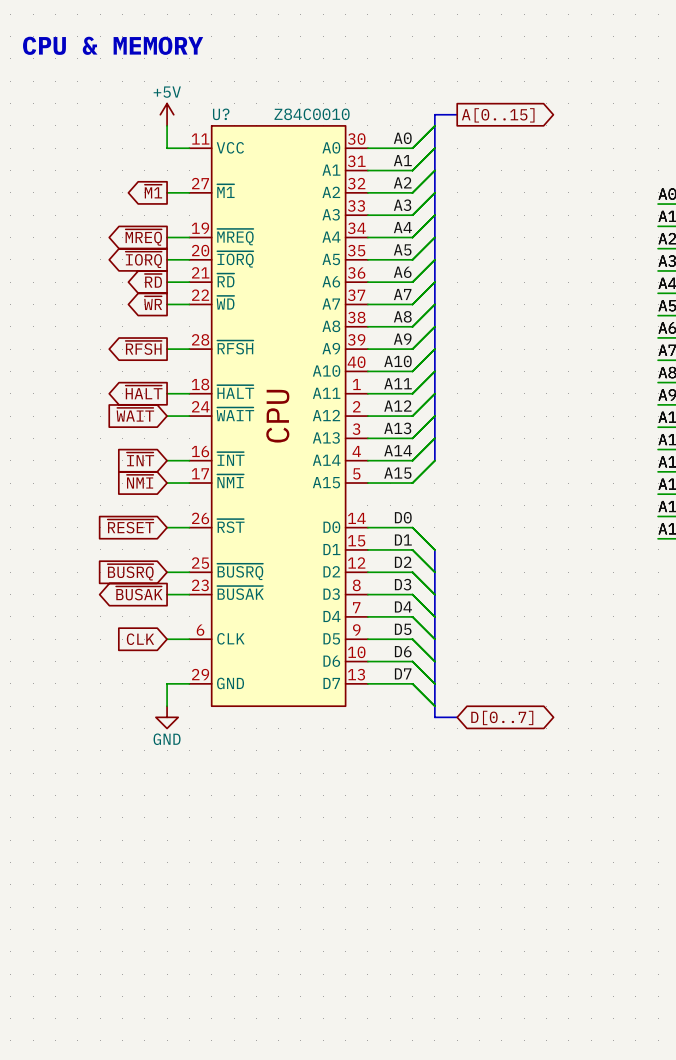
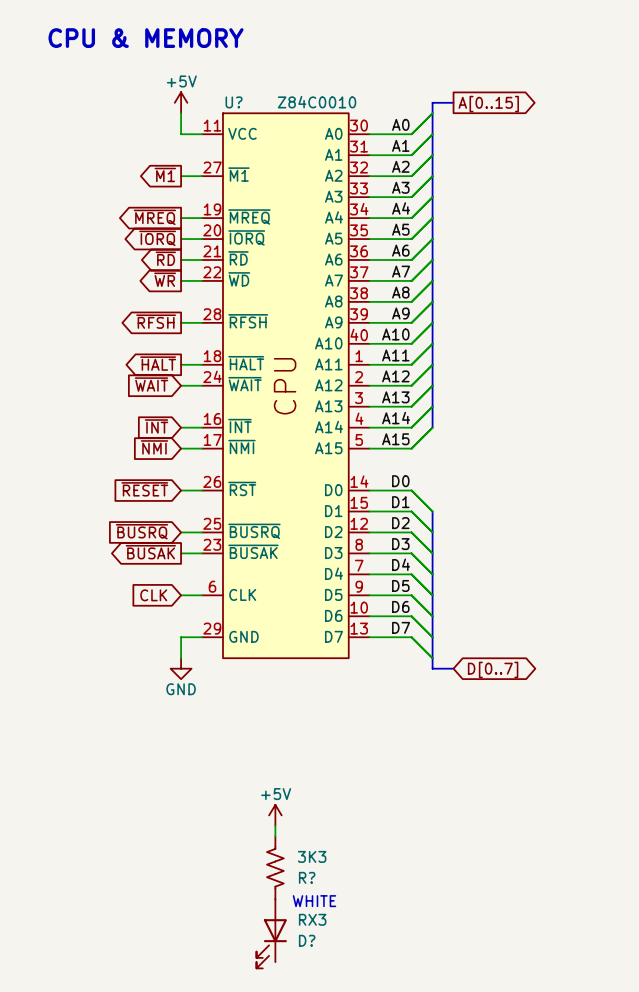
power symbol: none -> +5V (275, 815)
wire: none -> (275, 825) (275, 836)
R?: none -> 3K3 (275, 867)
text: none -> WHITE (314, 901)
D?: none -> RX3 (271, 933)

